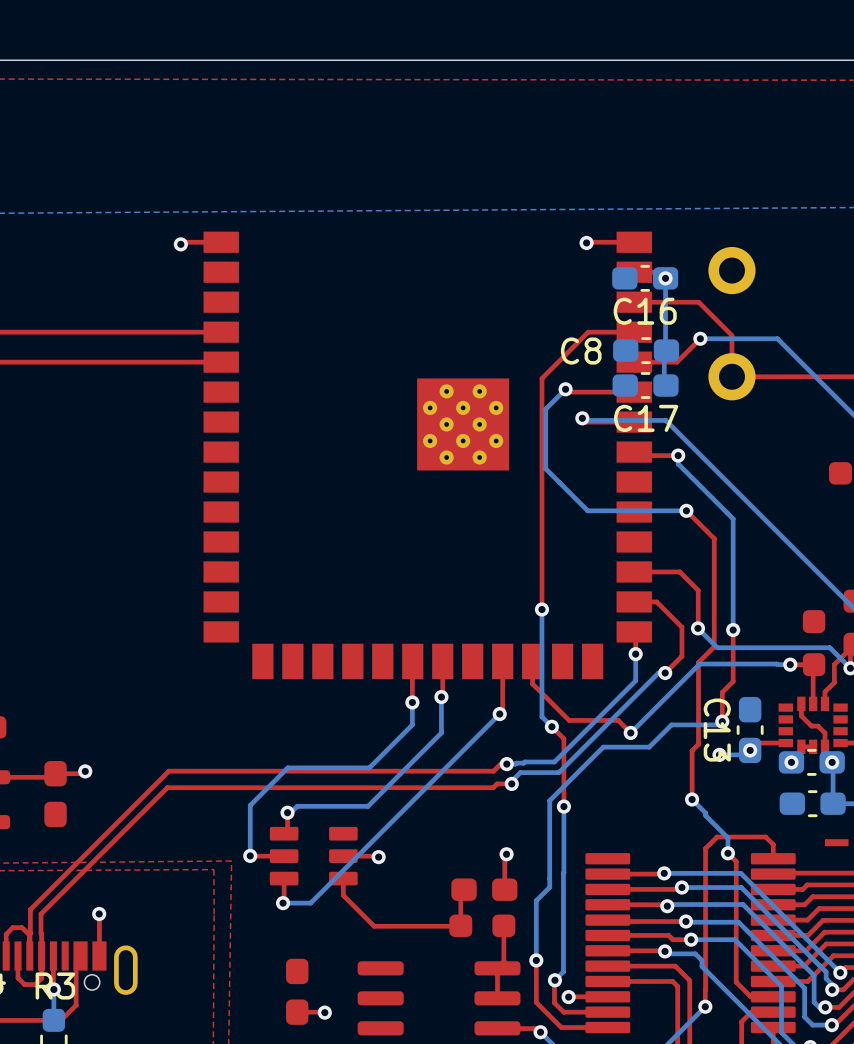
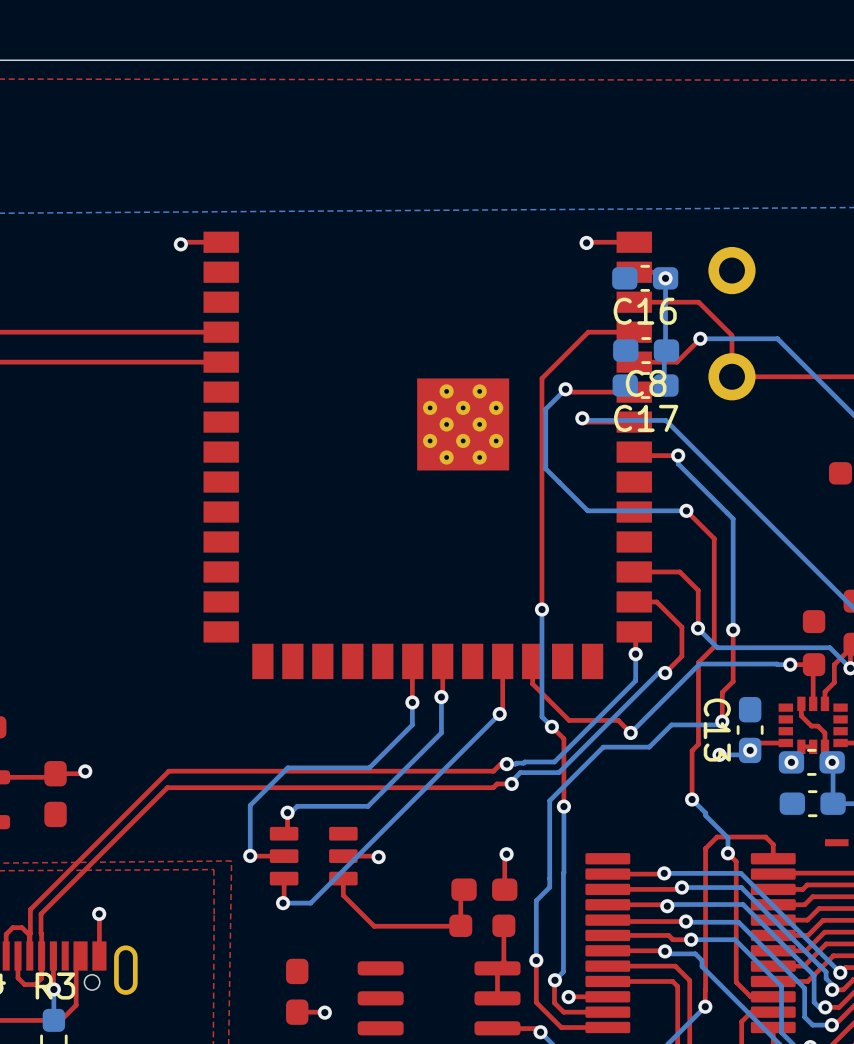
C8 name position: C8 (581, 351) -> C8 (646, 383)

